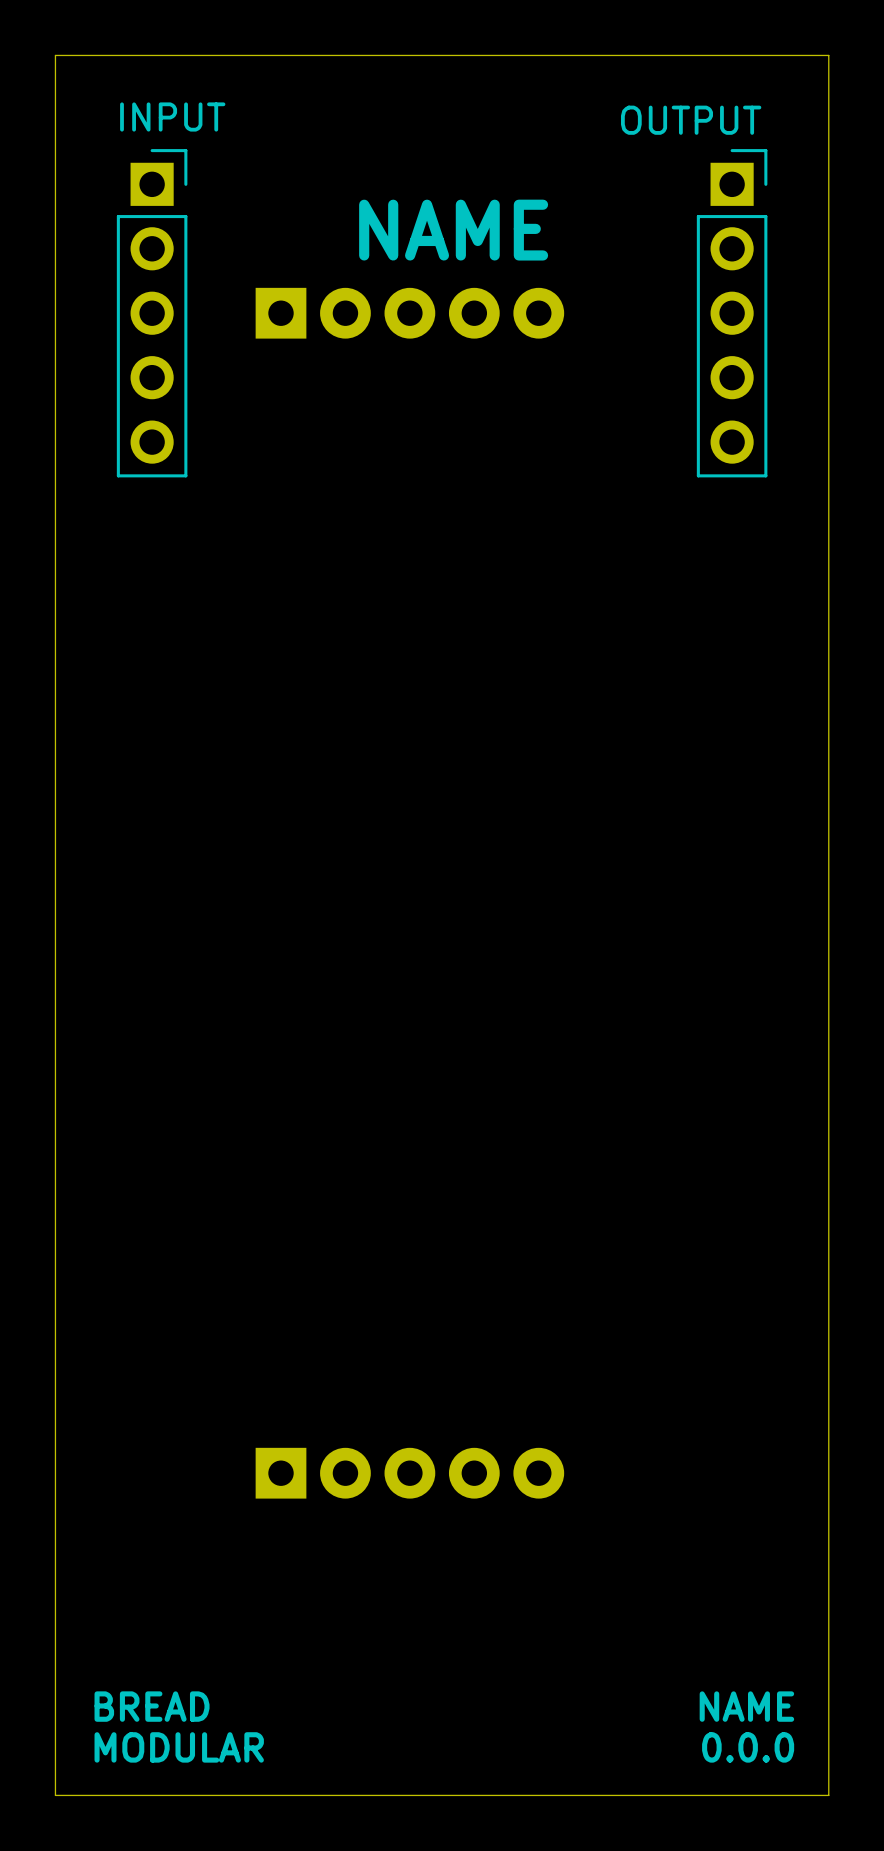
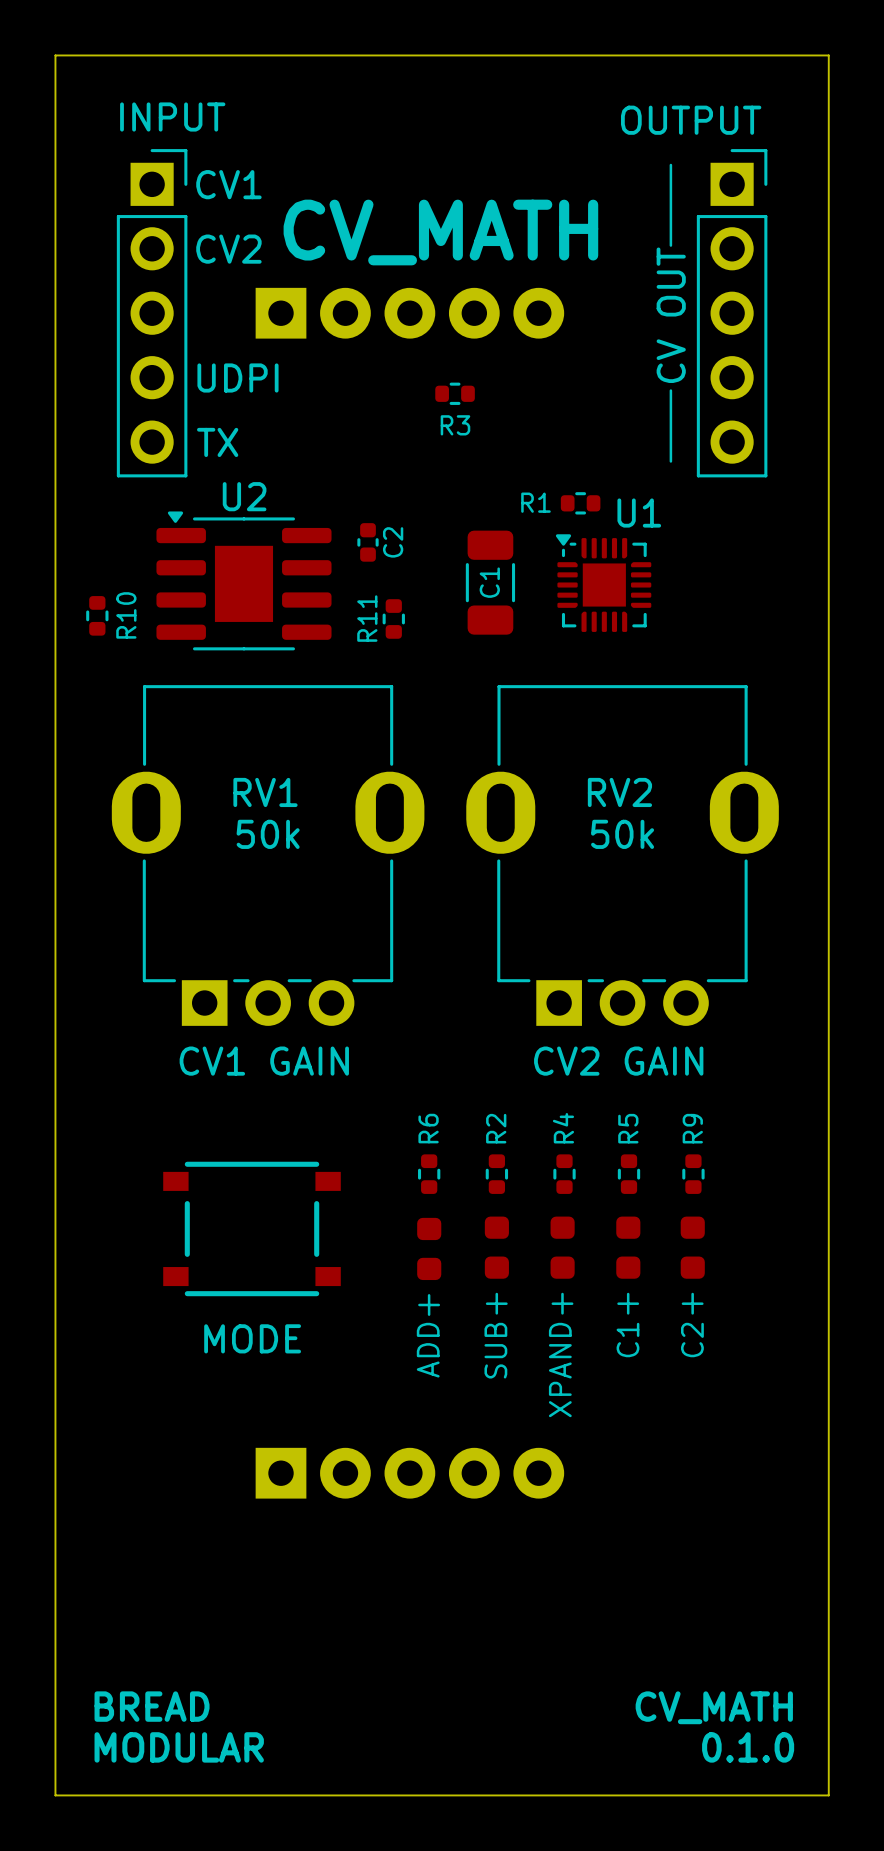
line: none -> (670, 165) (670, 245)
text: none -> CV1 (228, 184)
text: NAME (453, 230) -> none
text: none -> CV_MATH (440, 232)
text: none -> CV2 (228, 249)
text: none -> CV OUT (671, 315)
text: none -> UDPI (237, 377)
line: none -> (670, 390) (670, 461)
R3: none -> (455, 393)
text: none -> TX (217, 442)
R1: none -> (580, 503)
C2: none -> (368, 542)
U2: none -> (243, 580)
C1: none -> (490, 582)
U1: none -> (603, 583)
R10: none -> (97, 615)
R11: none -> (393, 618)
RV1: none -> 50k (268, 855)
RV2: none -> 50k (622, 855)
text: none -> CV1 GAIN (264, 1061)
text: none -> CV2 GAIN (618, 1061)
R6: none -> (429, 1174)
R2: none -> (496, 1174)
R4: none -> (564, 1174)
R5: none -> (629, 1174)
R9: none -> (693, 1174)
part: none -> (252, 1228)
part: none -> (496, 1247)
part: none -> (562, 1247)
part: none -> (628, 1247)
part: none -> (692, 1247)
part: none -> (429, 1248)
text: none -> MODE (252, 1338)
text: none -> C1 (627, 1340)
text: none -> C2 (692, 1340)
text: none -> ADD (428, 1350)
text: none -> SUB (495, 1350)
text: none -> XPAND (560, 1369)
text: NAME (746, 1706) -> CV_MATH (714, 1707)
text: 0.0.0 (748, 1747) -> 0.1.0 (748, 1747)

